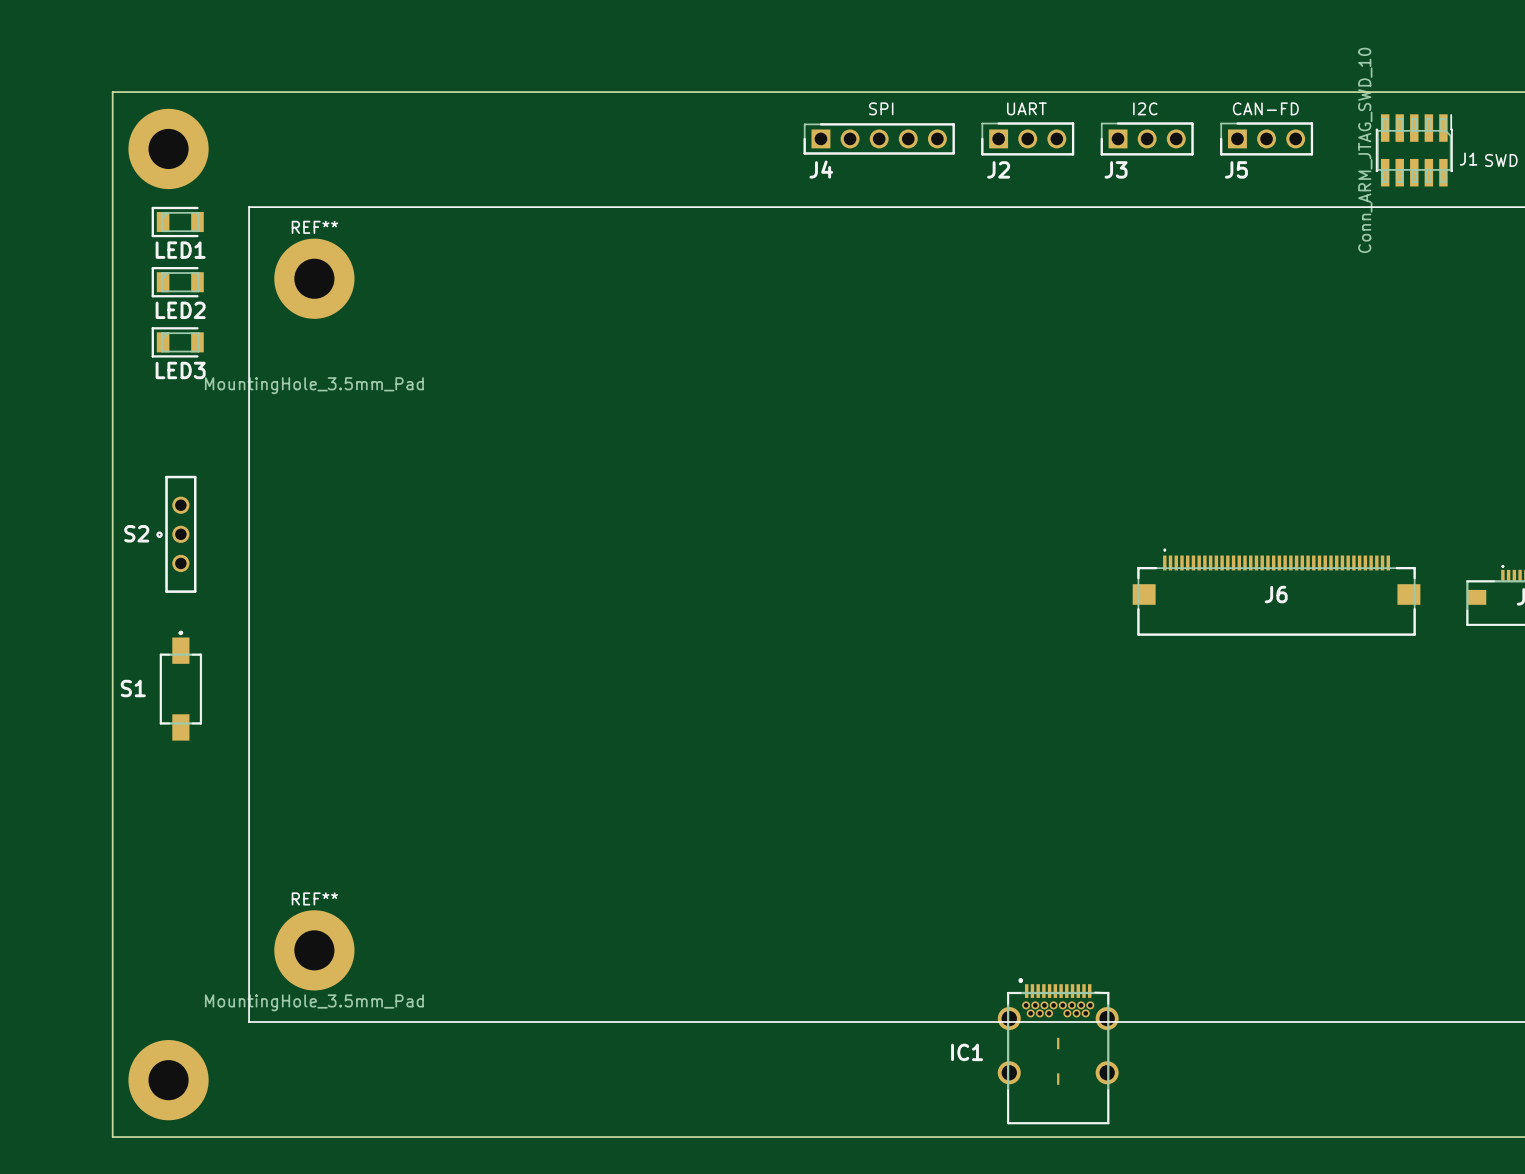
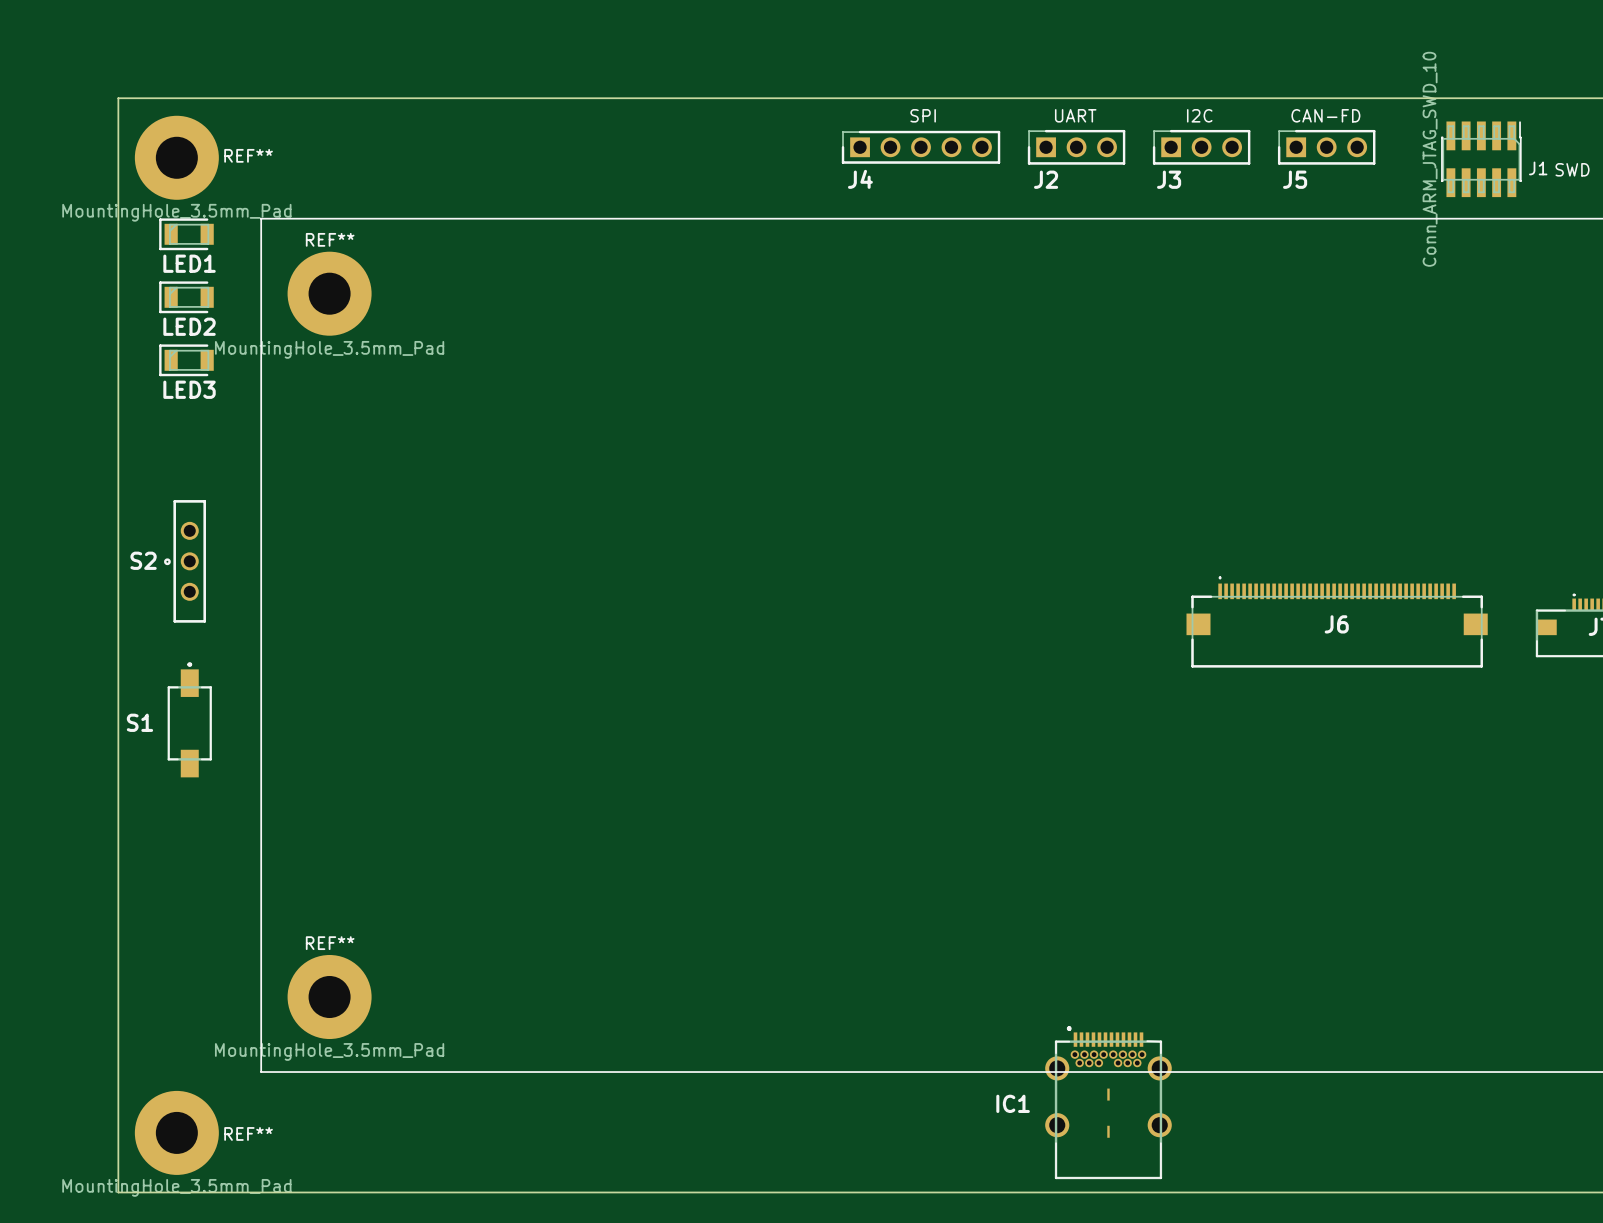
REF** name: none -> REF** (248, 155)
REF** value: none -> MountingHole_3.5mm_Pad (176, 212)
REF** value position: MountingHole_3.5mm_Pad (314, 385) -> MountingHole_3.5mm_Pad (329, 349)
REF** name: none -> REF** (248, 1133)
REF** value: none -> MountingHole_3.5mm_Pad (176, 1187)

